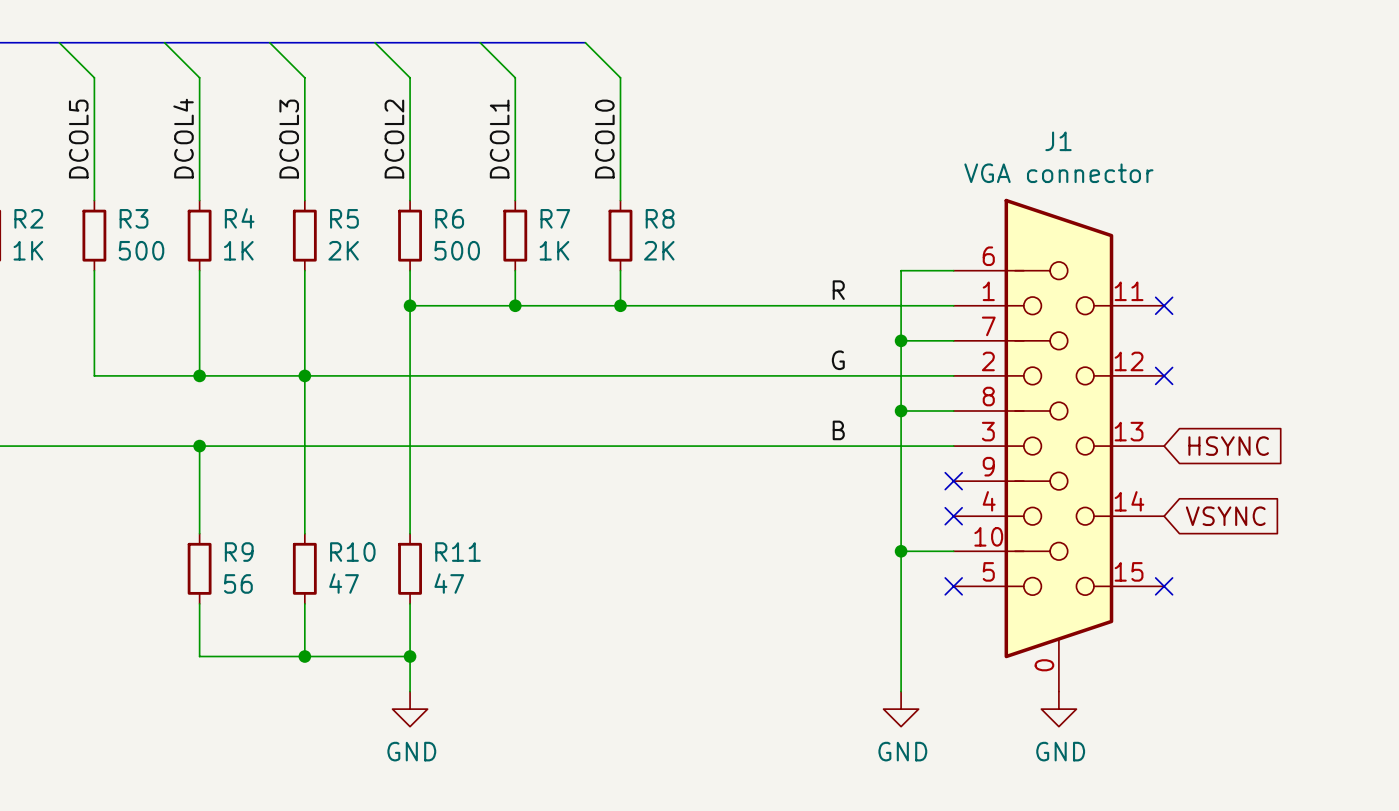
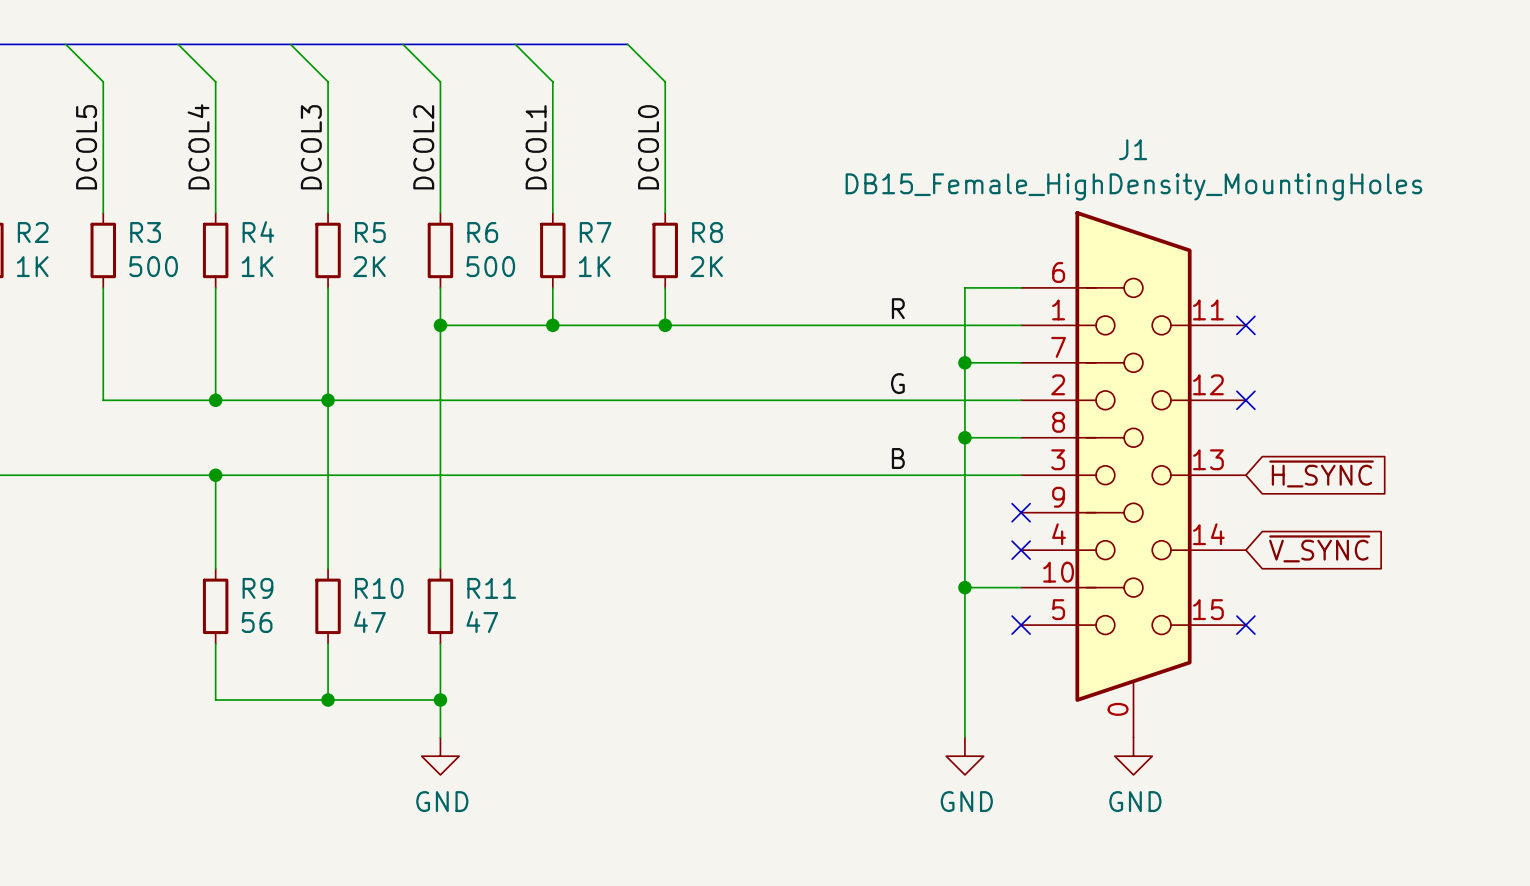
J1 value: VGA connector (1058, 173) -> DB15_Female_HighDensity_MountingHoles (1133, 186)
global label: HSYNC (1228, 446) -> ~{H_SYNC} (1321, 473)
global label: VSYNC (1225, 516) -> ~{V_SYNC} (1319, 548)

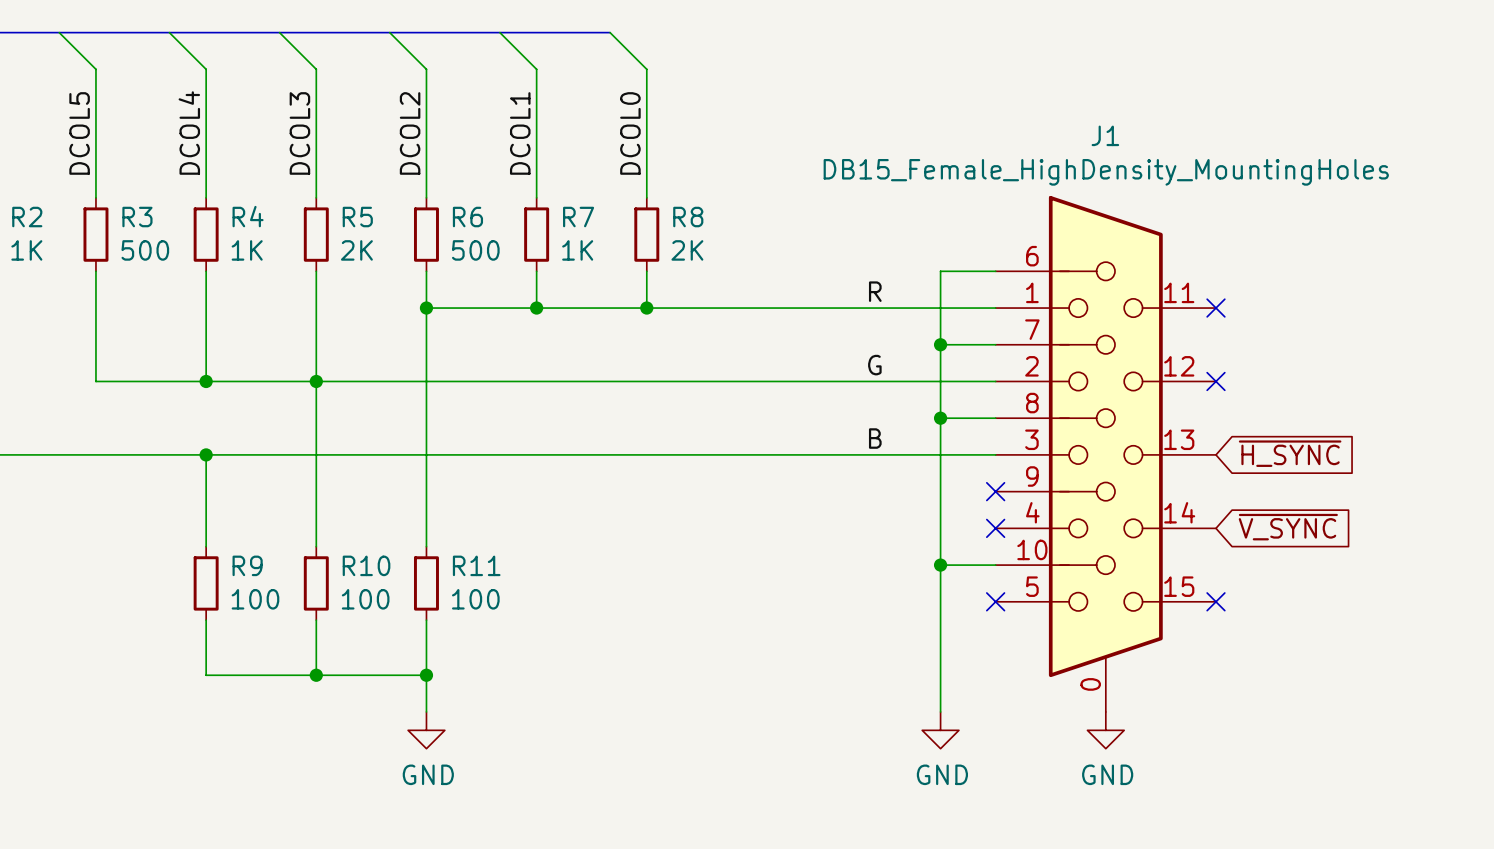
R9 value: 56 (257, 622) -> 100 (255, 599)
R10 value: 47 (369, 622) -> 100 (365, 599)
R11 value: 47 (482, 622) -> 100 (475, 599)

